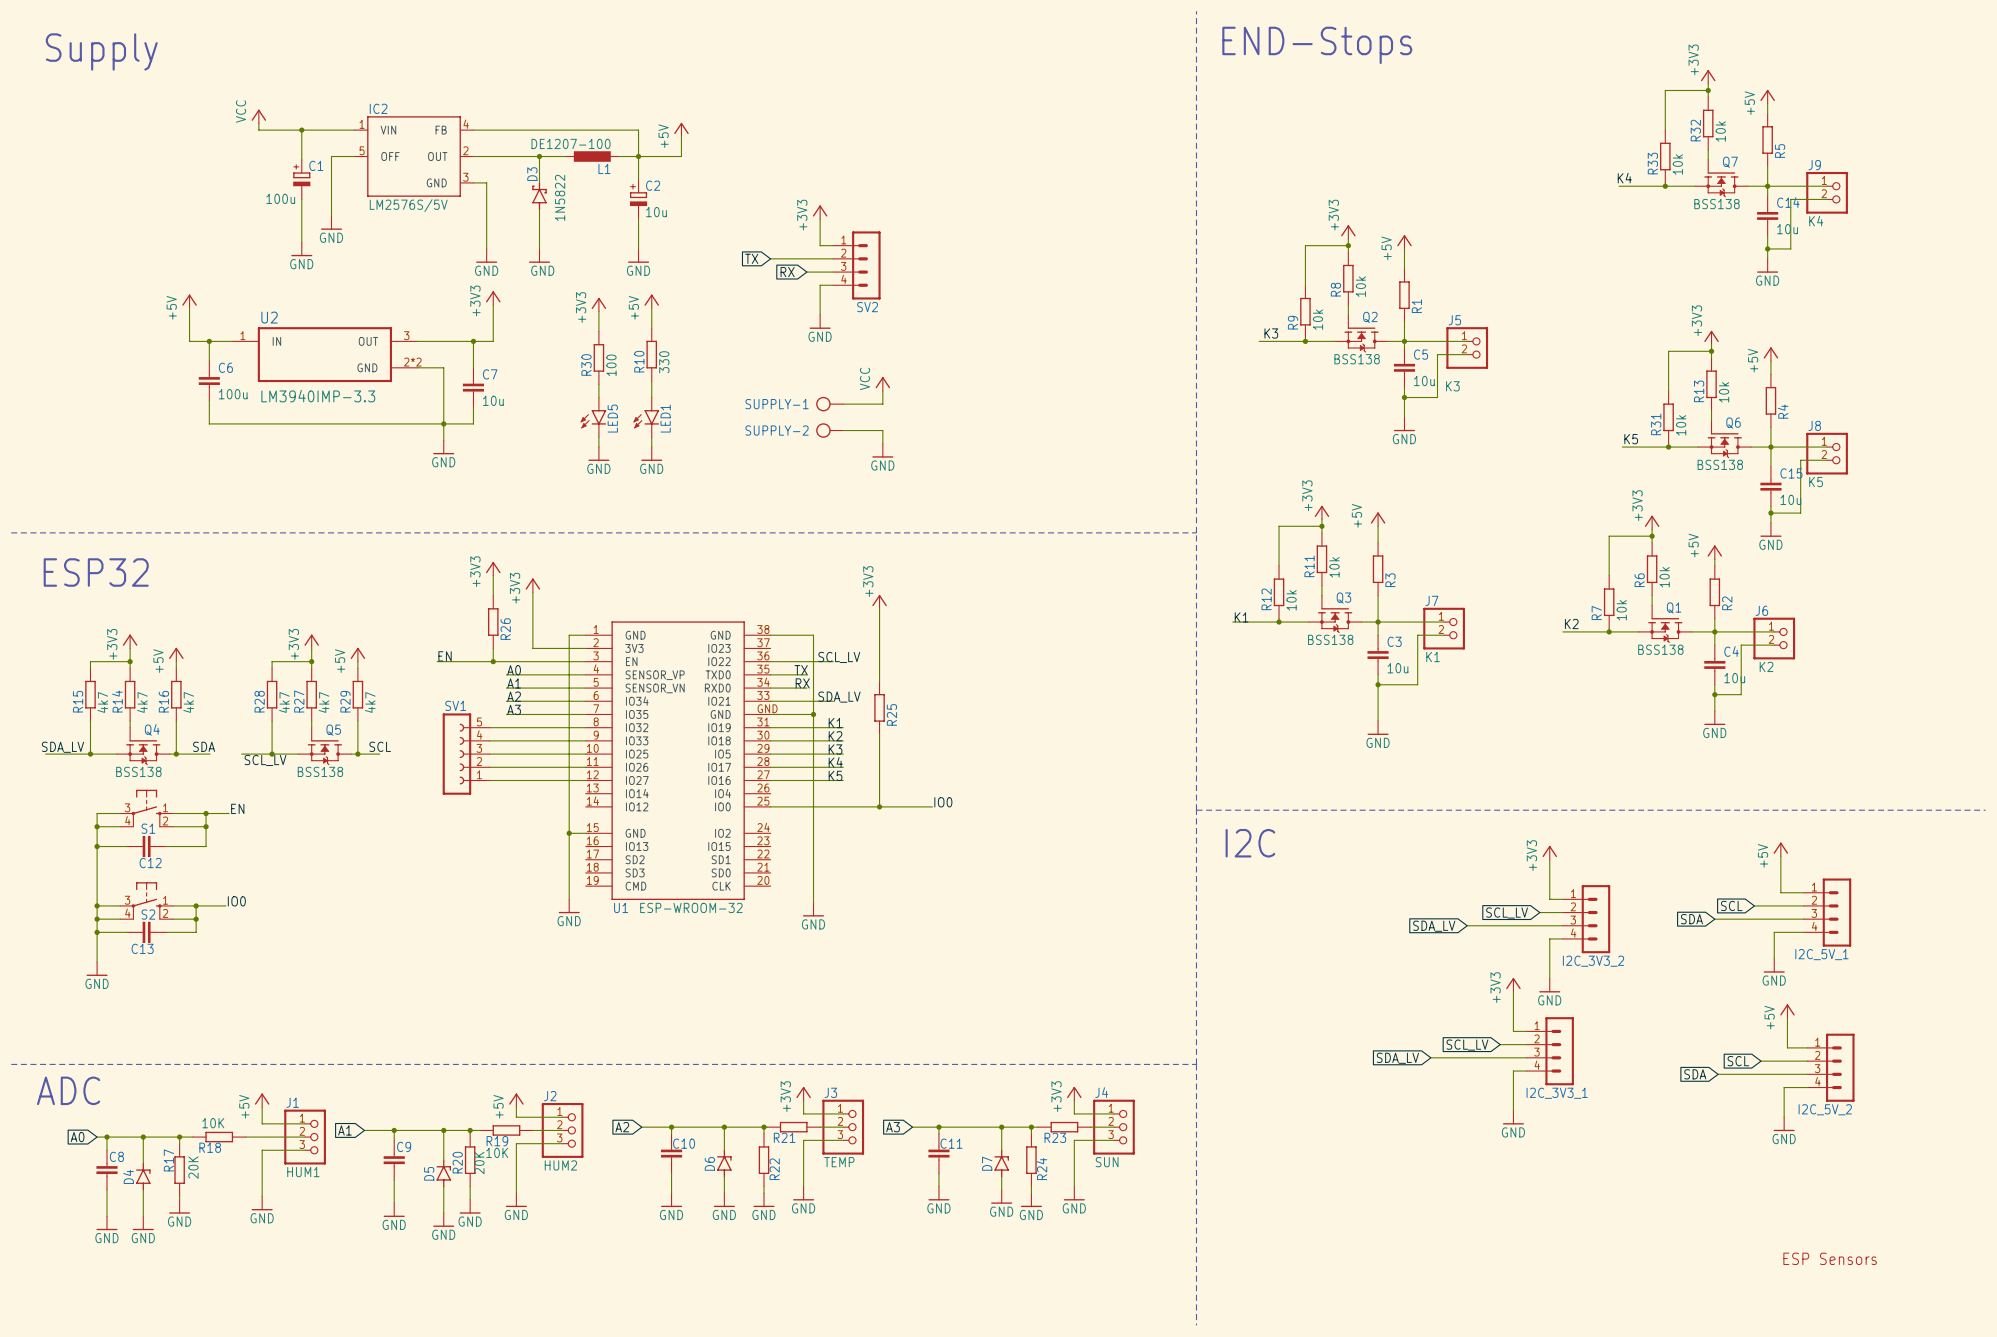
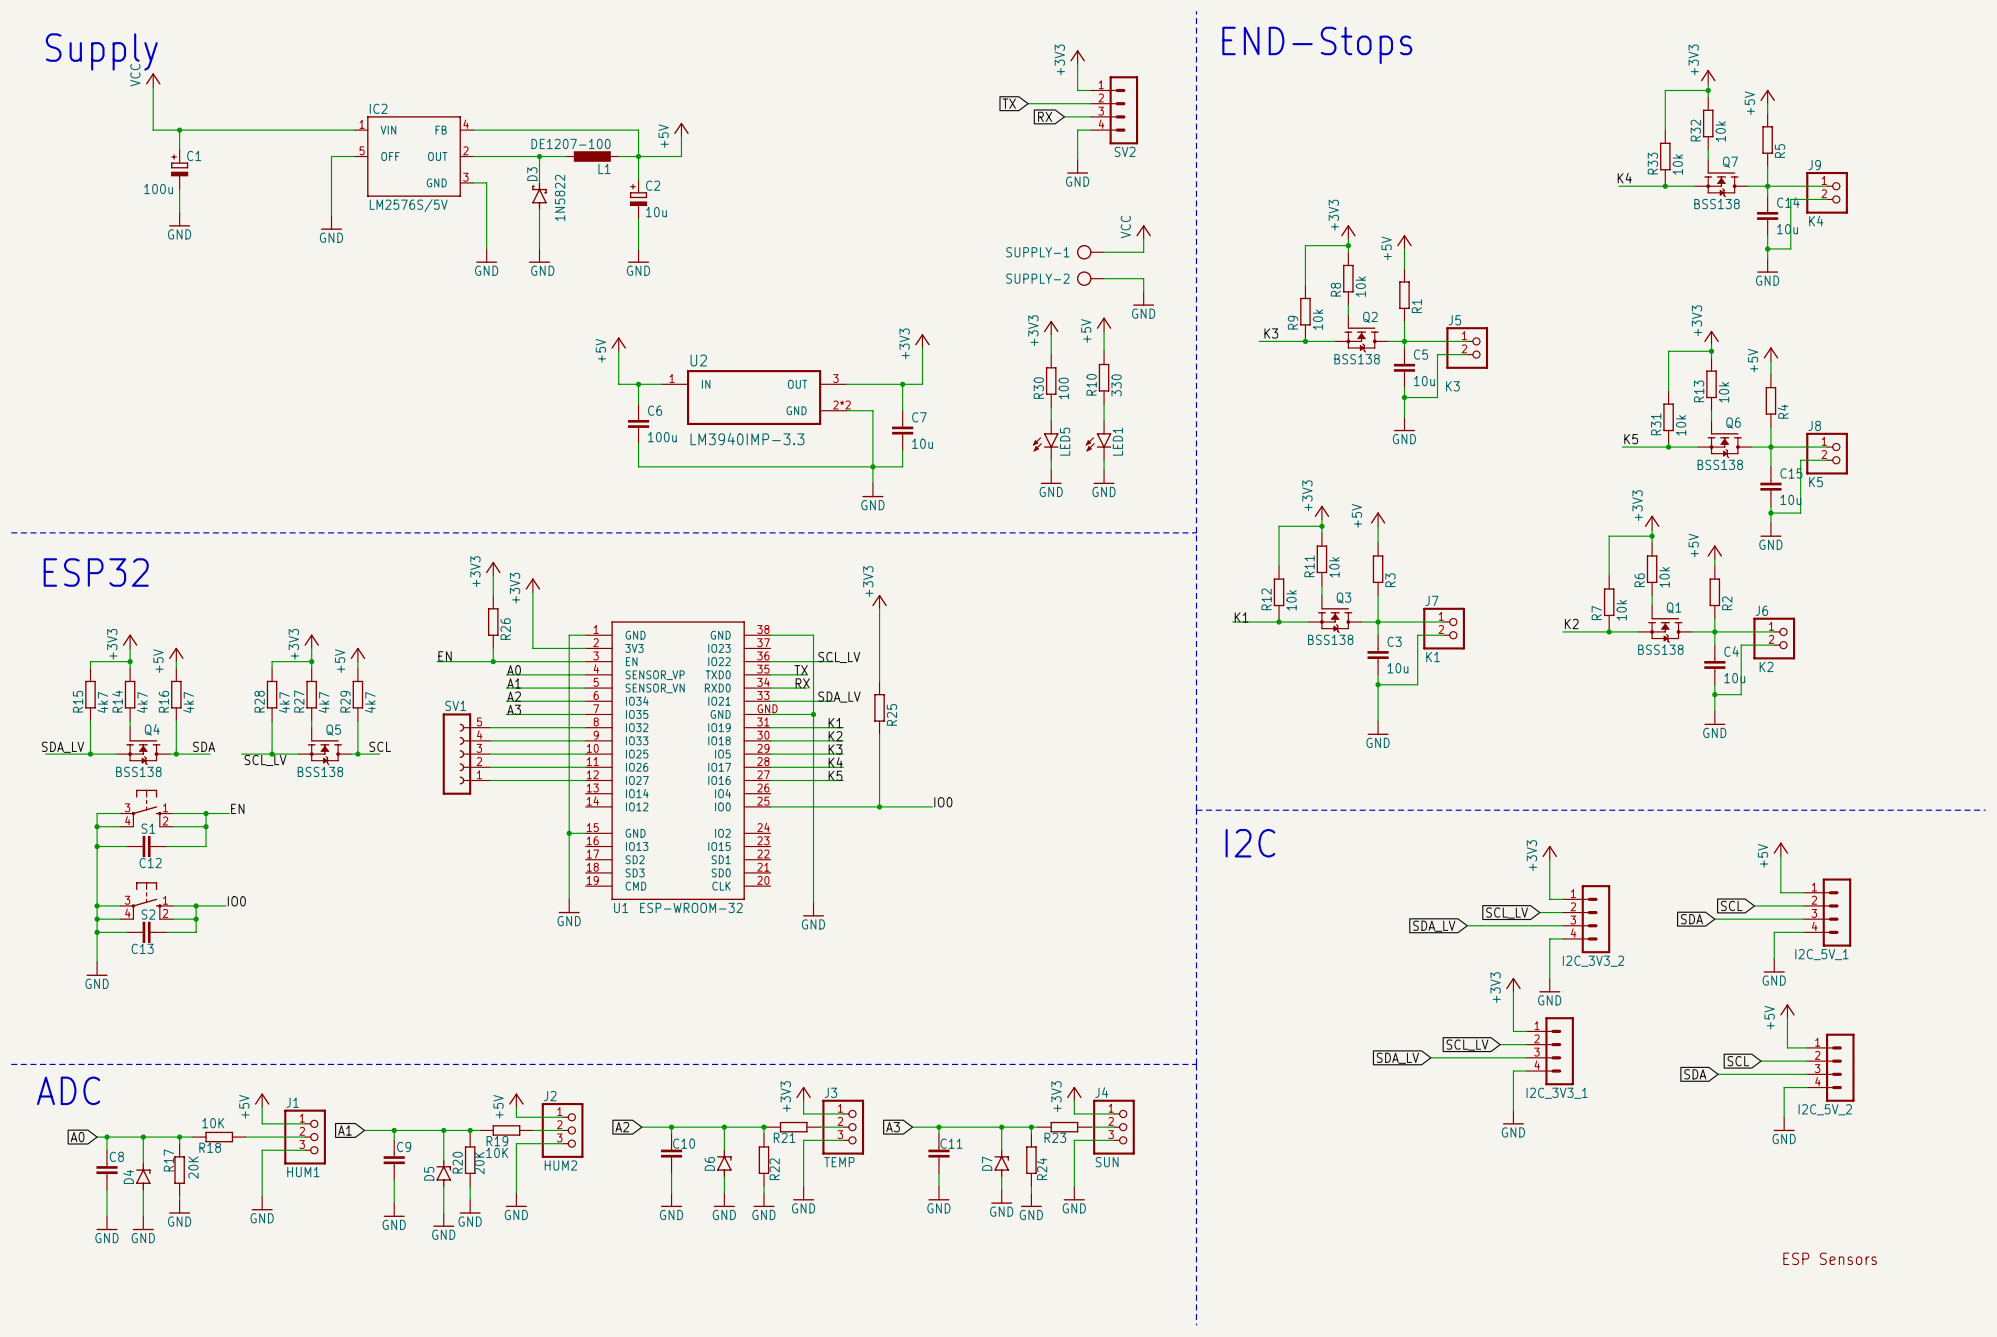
power symbol: none -> +3V3 (1077, 57)
wire: none -> (1077, 64) (1077, 90) (1090, 90)
global label: none -> TX (1009, 103)
wire: none -> (1028, 103) (1090, 103)
power symbol position: VCC (258, 116) -> VCC (153, 80)
global label: none -> RX (1045, 116)
wire: none -> (1064, 116) (1090, 116)
wire: (258, 123) (258, 130) -> (153, 87) (153, 130) (258, 130)
wire: none -> (179, 130) (179, 149)
junction: none -> (179, 130)
wire: (301, 130) (301, 159) -> none
junction: (301, 130) -> none
wire: none -> (1090, 130) (1077, 130) (1077, 159)
power symbol: none -> GND (1077, 166)
C1 position: (301, 179) -> (179, 169)
wire: none -> (179, 189) (179, 212)
wire: (301, 199) (301, 242) -> none
power symbol: +3V3 (820, 212) -> none
wire: (820, 219) (820, 245) (833, 245) -> none
power symbol: none -> VCC (1143, 232)
wire: none -> (1143, 239) (1143, 252) (1104, 252)
power symbol position: GND (301, 249) -> GND (179, 219)
global label: TX (751, 258) -> none
wire: (770, 258) (833, 258) -> none
SV2 position: (856, 265) -> (1114, 110)
global label: RX (787, 272) -> none
wire: (806, 272) (833, 272) -> none
wire: none -> (1104, 278) (1143, 278) (1143, 291)
wire: (833, 285) (820, 285) (820, 314) -> none
power symbol: +3V3 (493, 298) -> none
power symbol: none -> GND (1143, 298)
power symbol: +5V (189, 301) -> none
power symbol position: +5V (651, 301) -> +5V (618, 344)
power symbol: +3V3 (598, 304) -> none
wire: (493, 305) (493, 341) (417, 341) -> none
wire: (189, 308) (189, 341) (232, 341) -> none
wire: (651, 308) (651, 328) -> (638, 384) (638, 404)
wire: (598, 311) (598, 331) -> none
power symbol: GND (820, 321) -> none
power symbol: none -> +5V (1104, 324)
power symbol: none -> +3V3 (1051, 327)
wire: none -> (1104, 331) (1104, 351)
wire: none -> (1051, 334) (1051, 354)
wire: (209, 341) (209, 361) -> none
junction: (209, 341) -> none
wire: (473, 341) (473, 367) -> none
junction: (473, 341) -> none
power symbol: none -> +3V3 (922, 341)
wire: none -> (922, 348) (922, 384) (846, 384)
wire: none -> (618, 351) (618, 384) (661, 384)
U2 position: (324, 354) -> (754, 397)
R10 position: (651, 354) -> (1104, 377)
R30 position: (598, 357) -> (1051, 381)
wire: (417, 367) (443, 367) (443, 440) -> none
C6 position: (209, 381) -> (638, 423)
wire: (651, 381) (651, 397) -> none
power symbol: VCC (882, 383) -> none
wire: (598, 384) (598, 397) -> none
junction: none -> (638, 384)
wire: none -> (902, 384) (902, 410)
junction: none -> (902, 384)
C7 position: (473, 387) -> (902, 430)
wire: (882, 390) (882, 404) (843, 404) -> none
wire: (209, 400) (209, 423) (473, 423) (473, 407) -> none
SUPPLY-1 position: (829, 404) -> (1090, 252)
wire: none -> (1104, 404) (1104, 420)
wire: none -> (1051, 407) (1051, 420)
wire: none -> (846, 410) (872, 410) (872, 483)
LED5 position: (593, 417) -> (1045, 440)
LED1 position: (646, 417) -> (1098, 440)
junction: (443, 423) -> none
SUPPLY-2 position: (829, 430) -> (1090, 278)
wire: (843, 430) (882, 430) (882, 443) -> none
wire: (598, 437) (598, 447) -> none
wire: (651, 437) (651, 447) -> none
wire: none -> (638, 443) (638, 466) (902, 466) (902, 450)
power symbol: GND (443, 447) -> none
power symbol position: GND (882, 450) -> GND (872, 490)
power symbol: GND (598, 453) -> none
power symbol: GND (651, 453) -> none
wire: none -> (1051, 460) (1051, 470)
wire: none -> (1104, 460) (1104, 470)
junction: none -> (872, 466)
power symbol: none -> GND (1051, 477)
power symbol: none -> GND (1104, 477)

